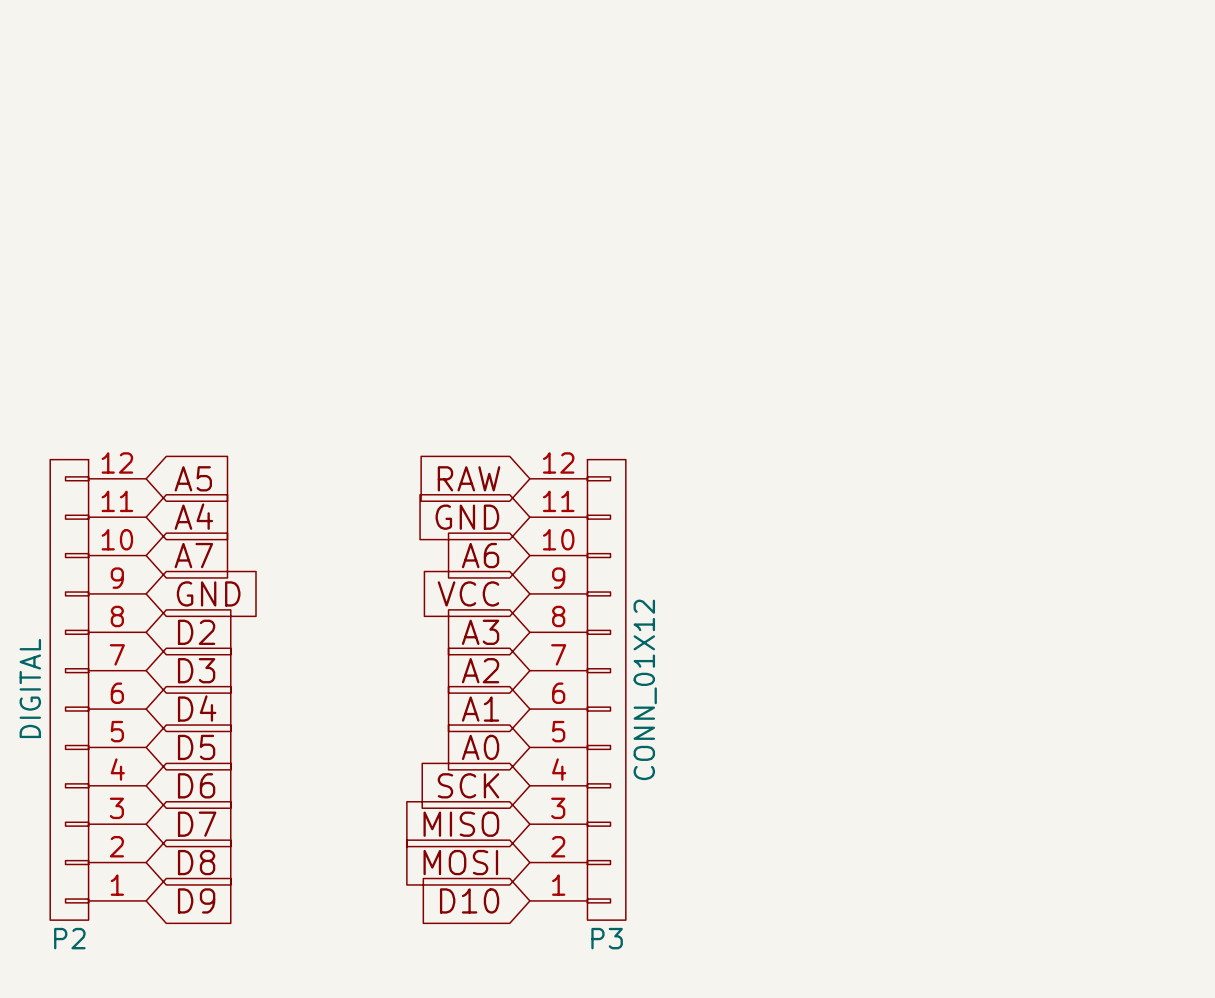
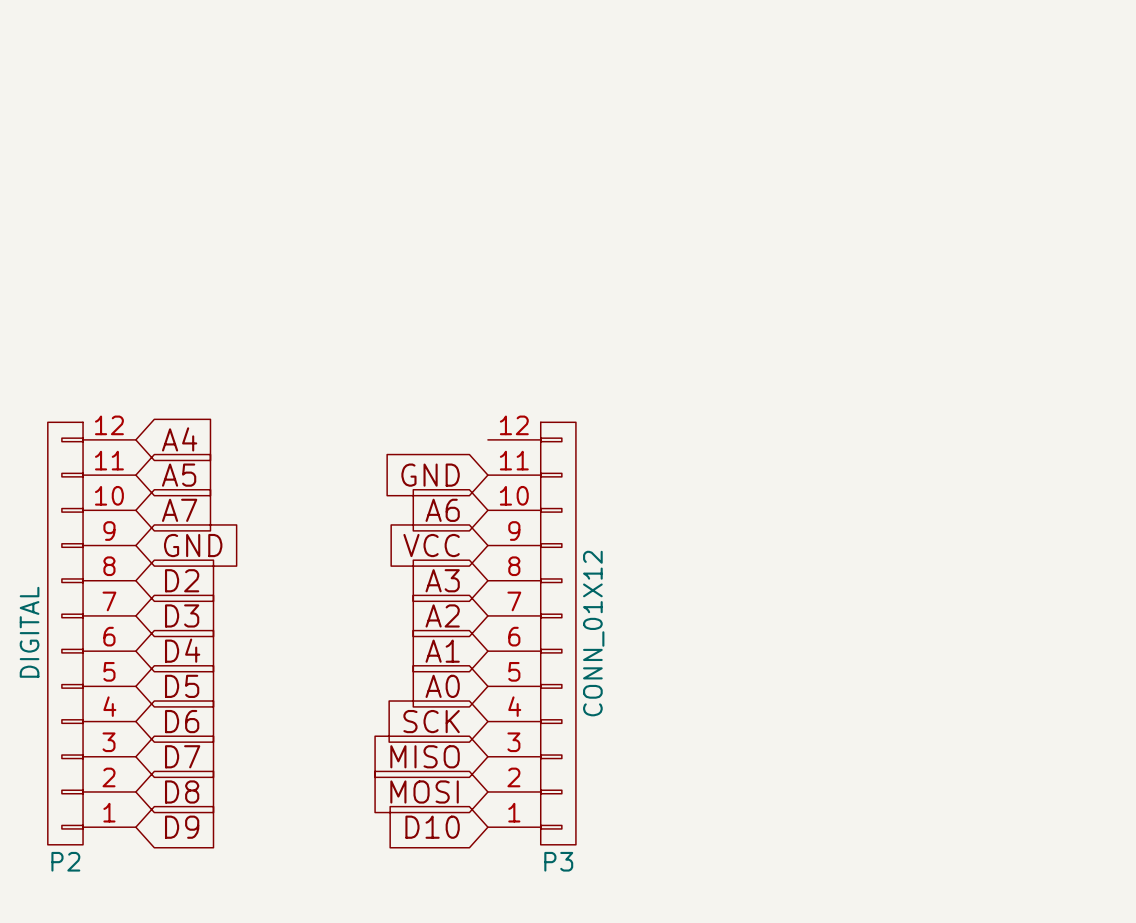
global label: A5 (193, 478) -> A4 (179, 439)
global label: RAW (469, 478) -> none
global label: A4 (193, 516) -> A5 (179, 475)

